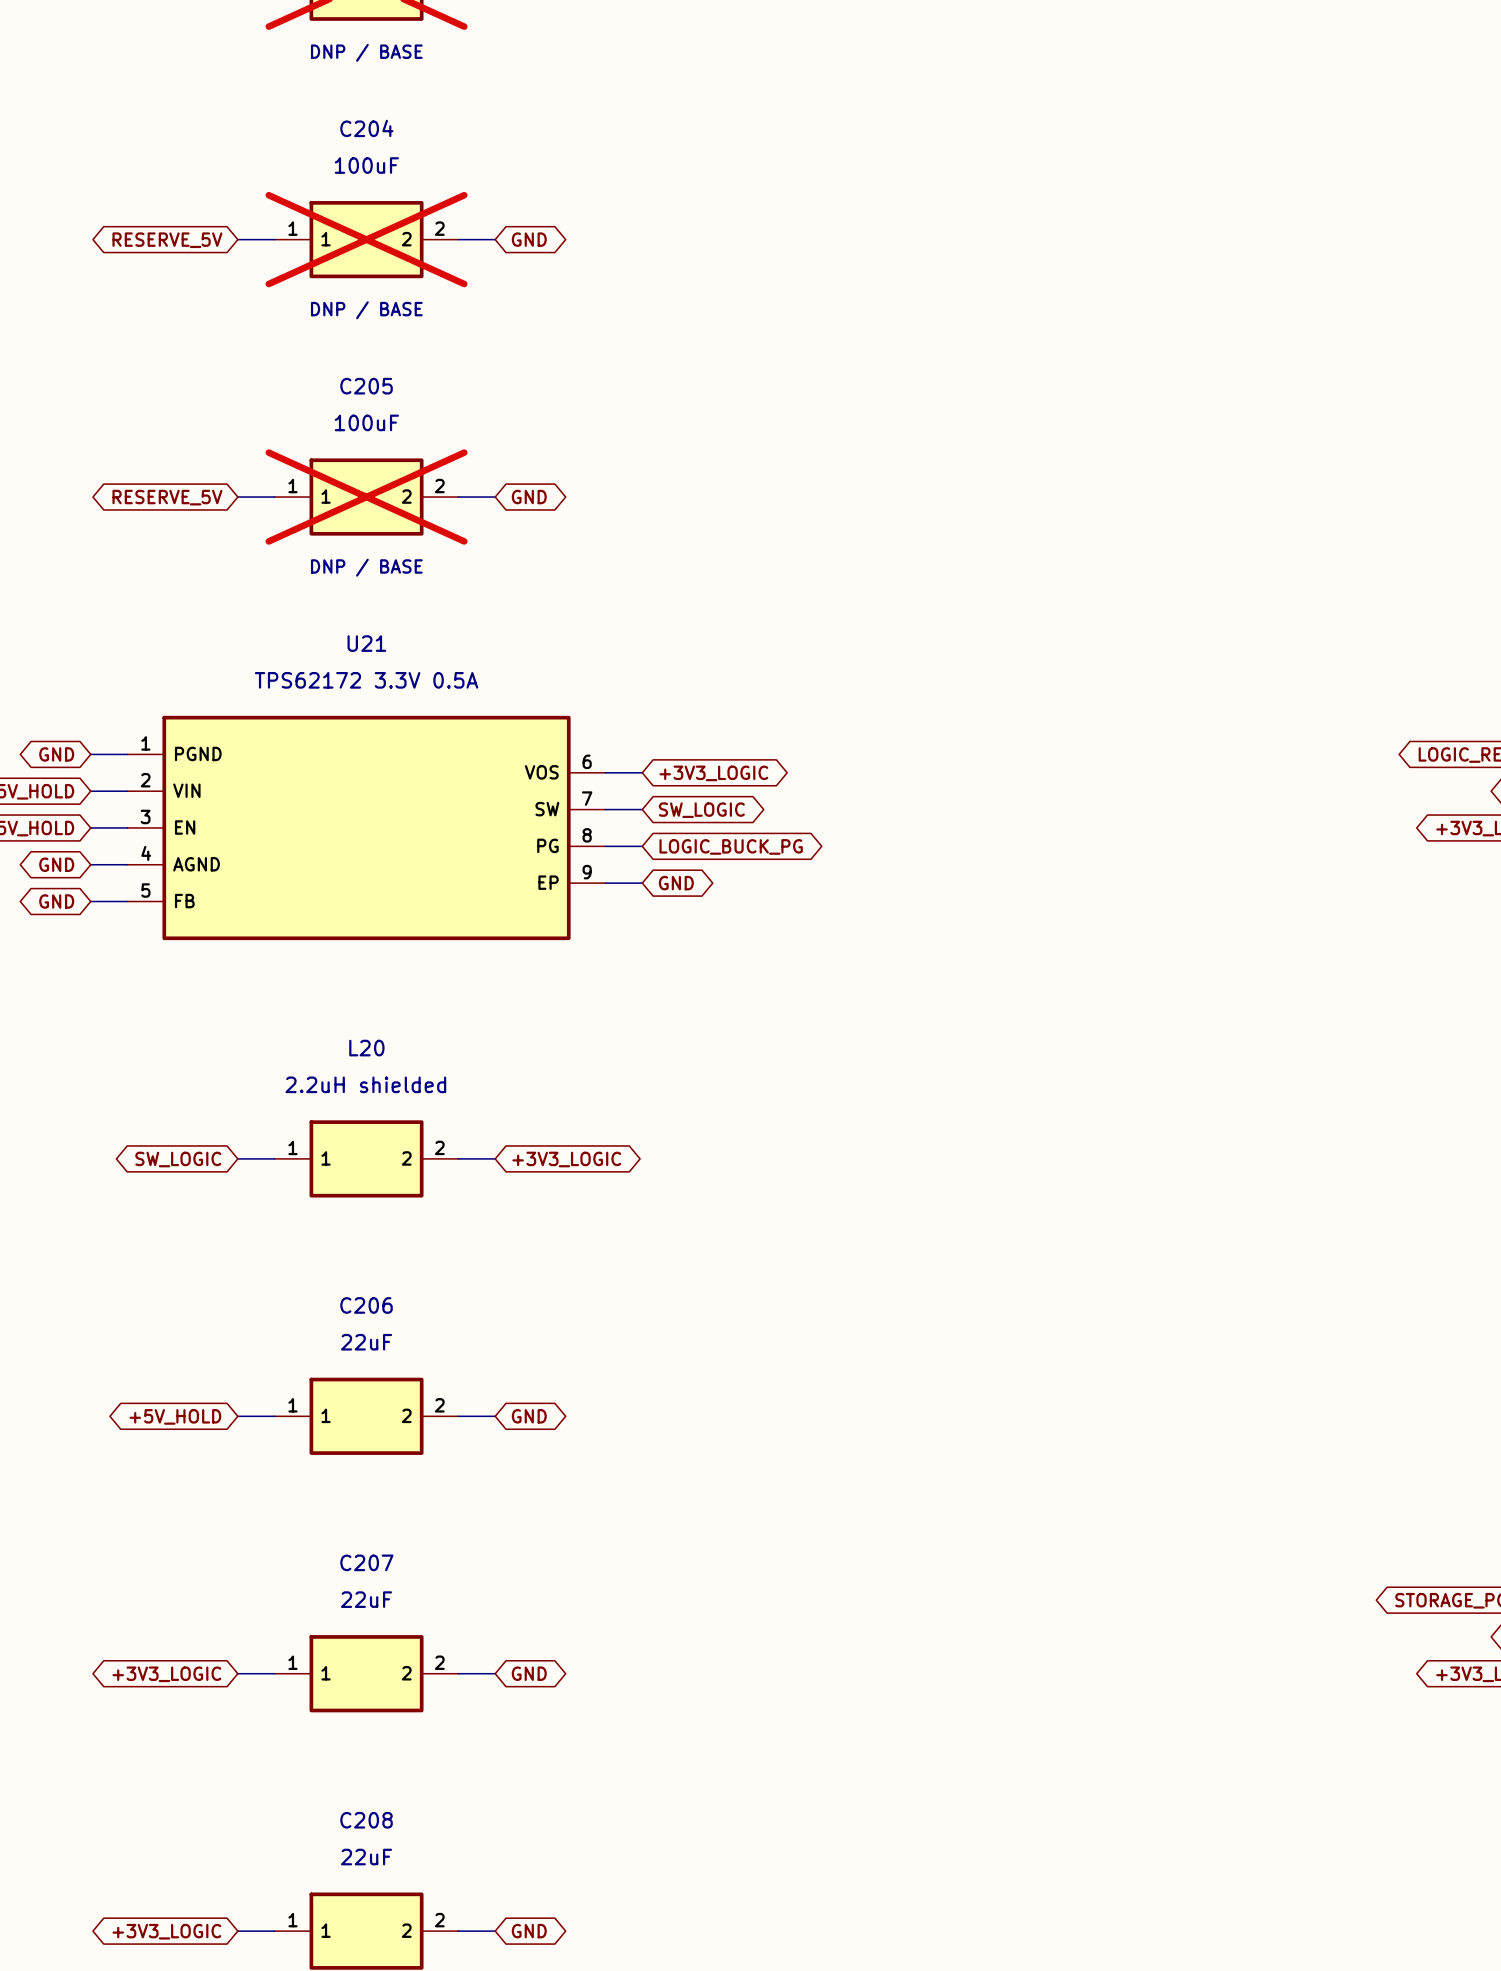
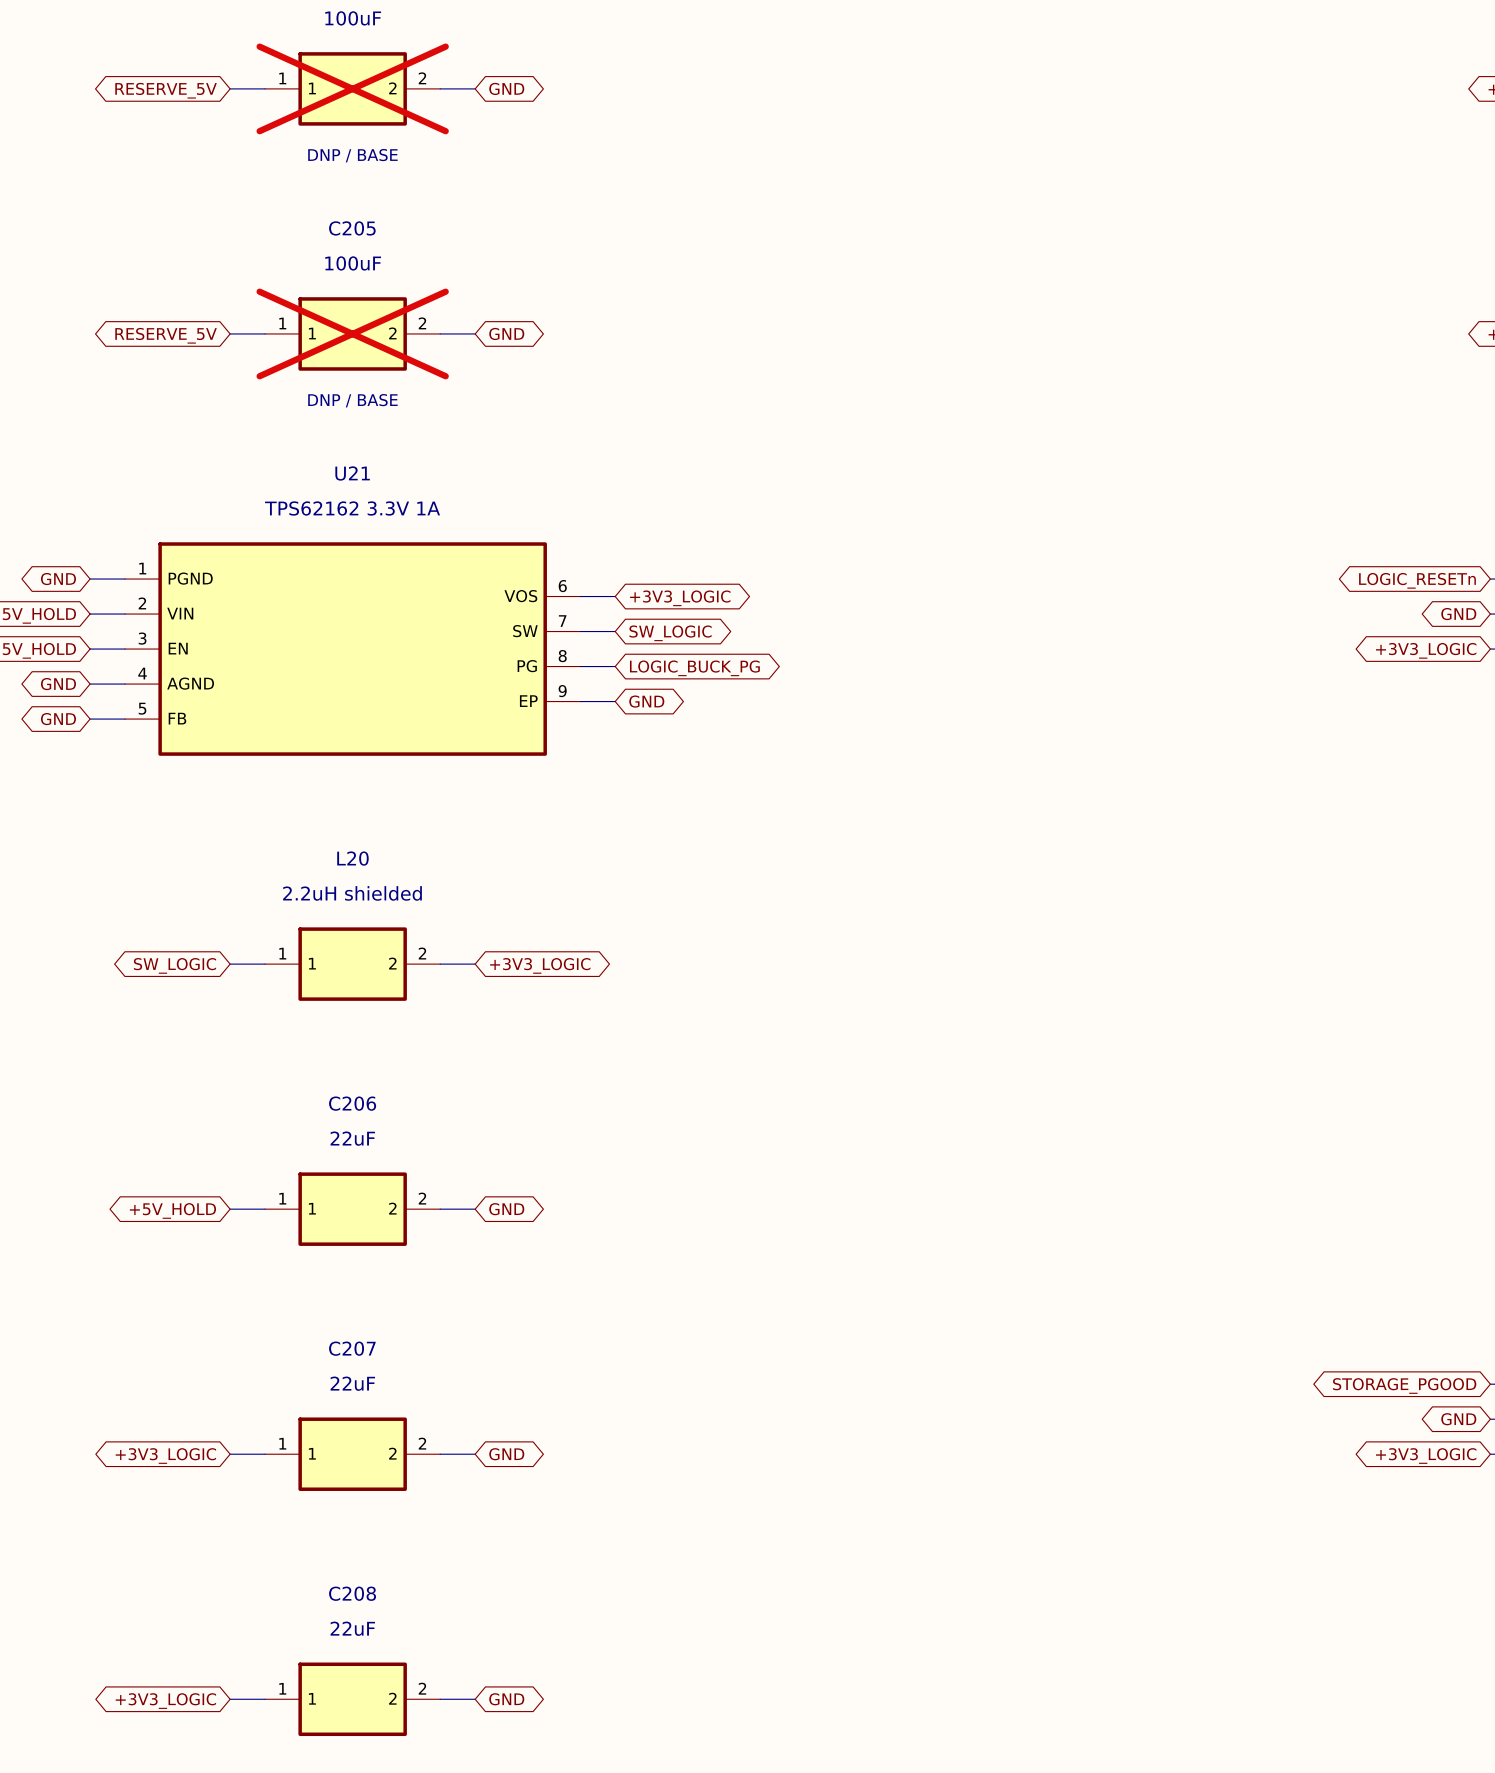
U21 value: TPS62172 3.3V 0.5A (366, 680) -> TPS62162 3.3V 1A (352, 508)

